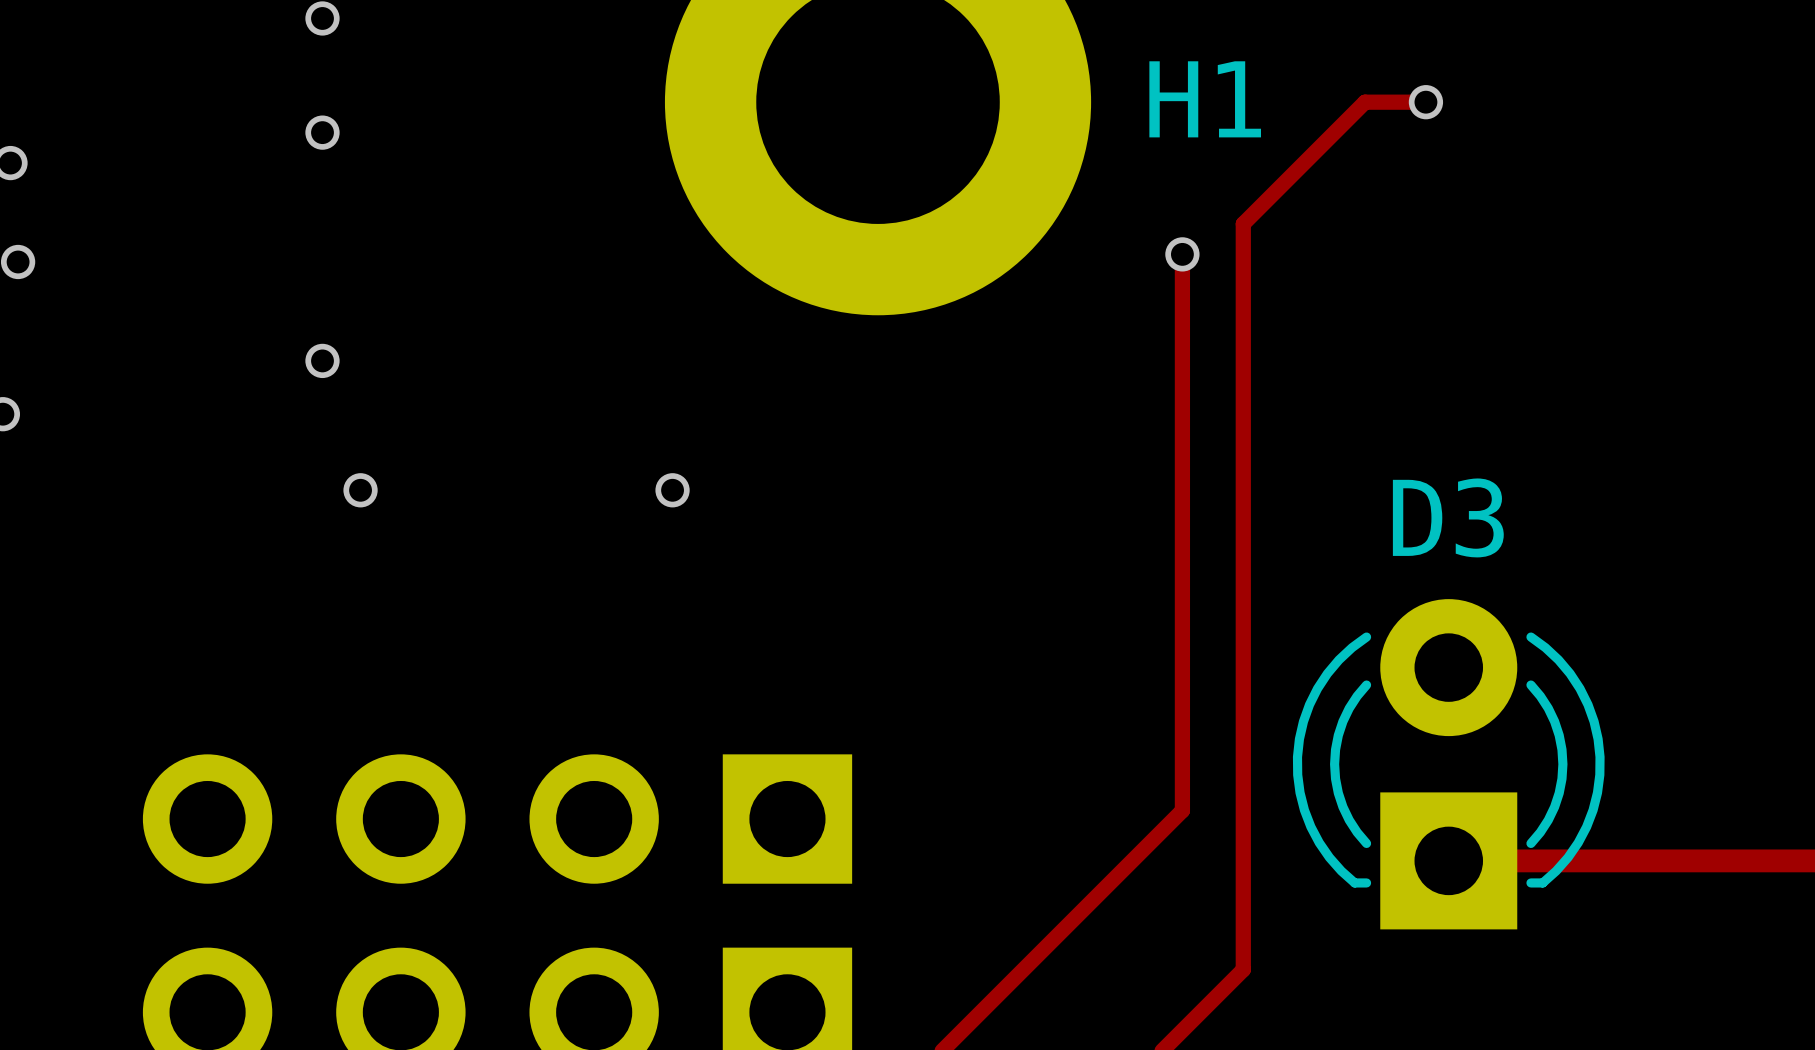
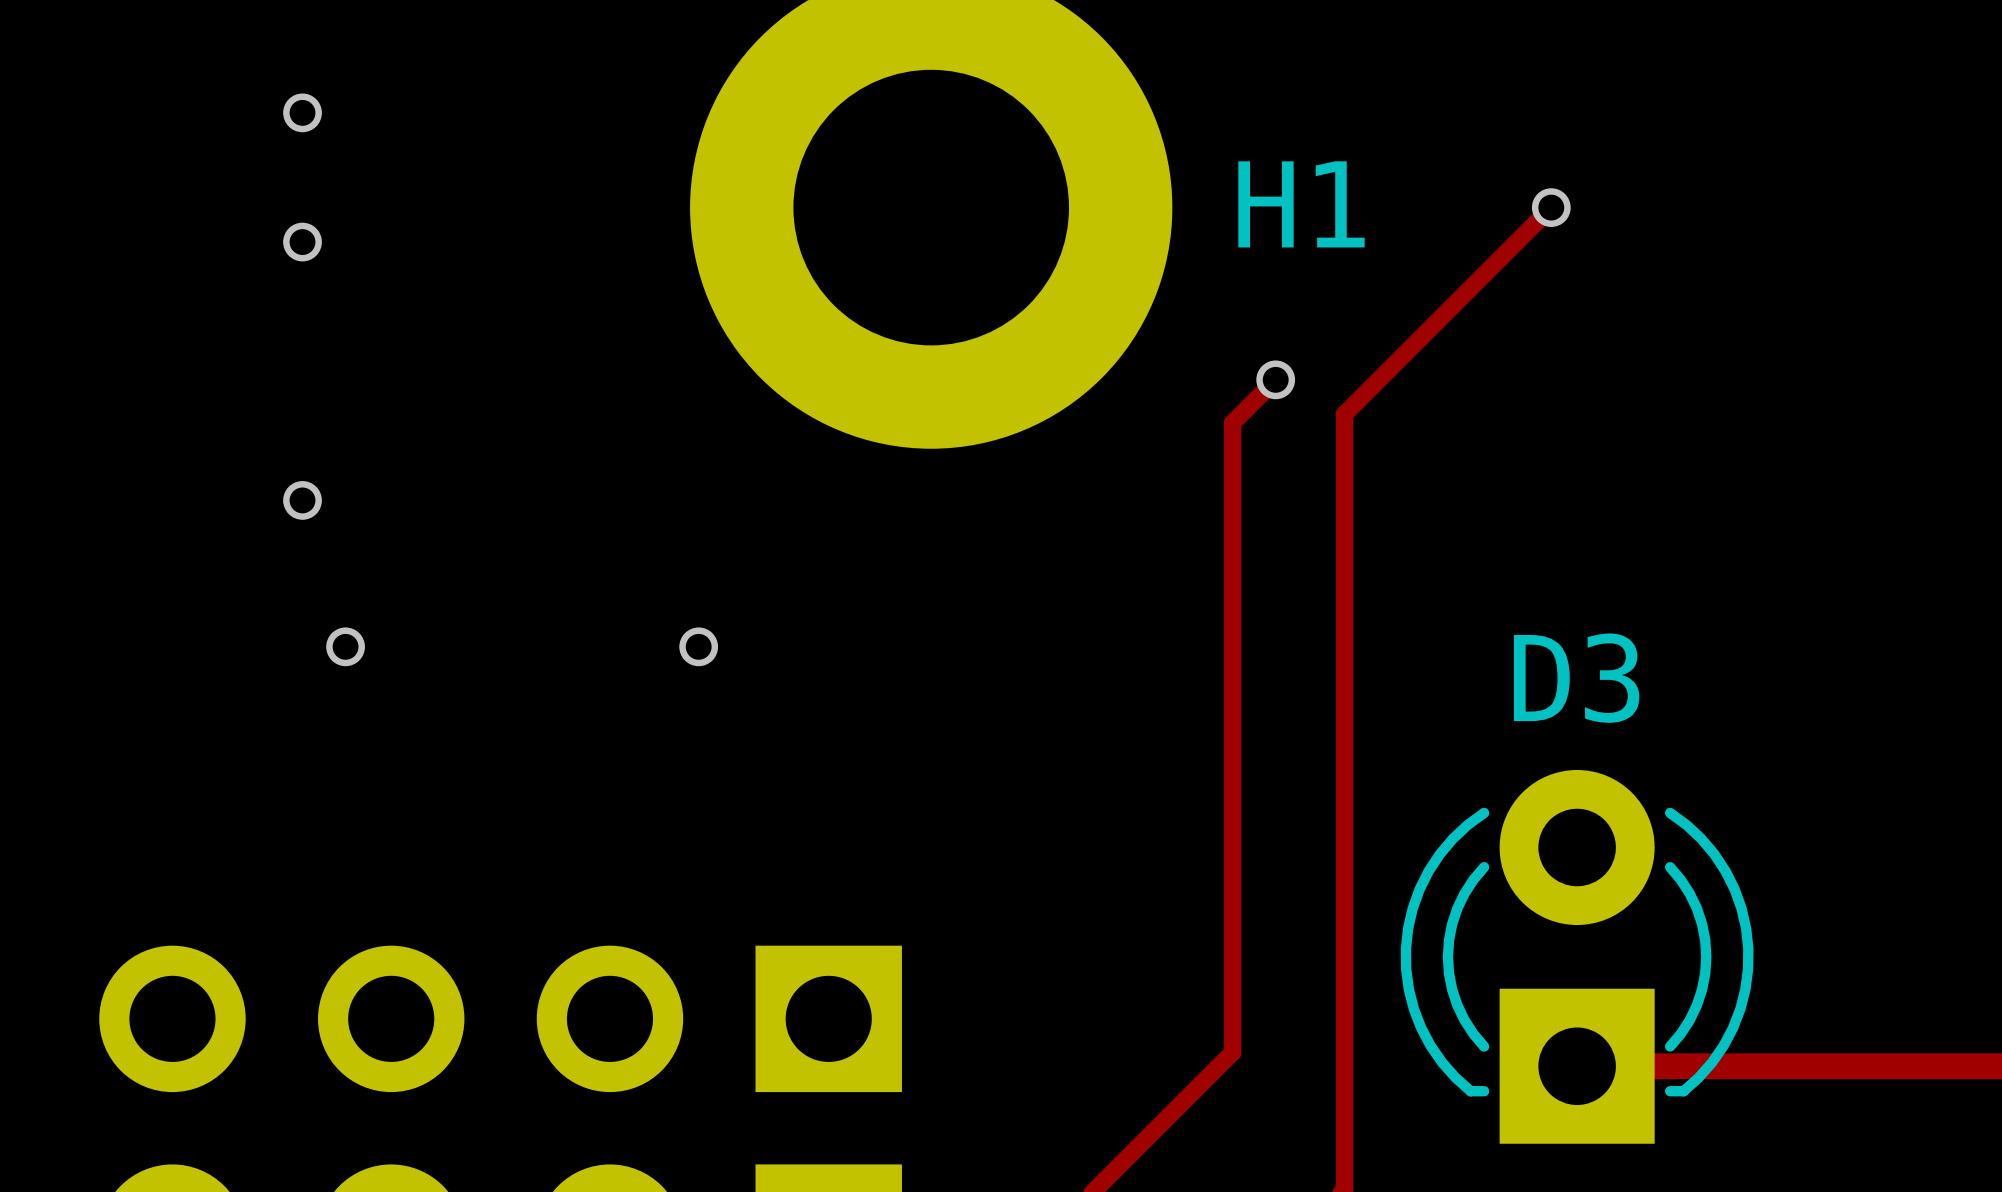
track: (1425, 102) (1365, 102) (1243, 223) (1243, 284) -> (1551, 207) (1344, 414)
track: (1182, 254) (1182, 810) (1144, 848) -> (1275, 379) (1232, 422) (1232, 1052)

